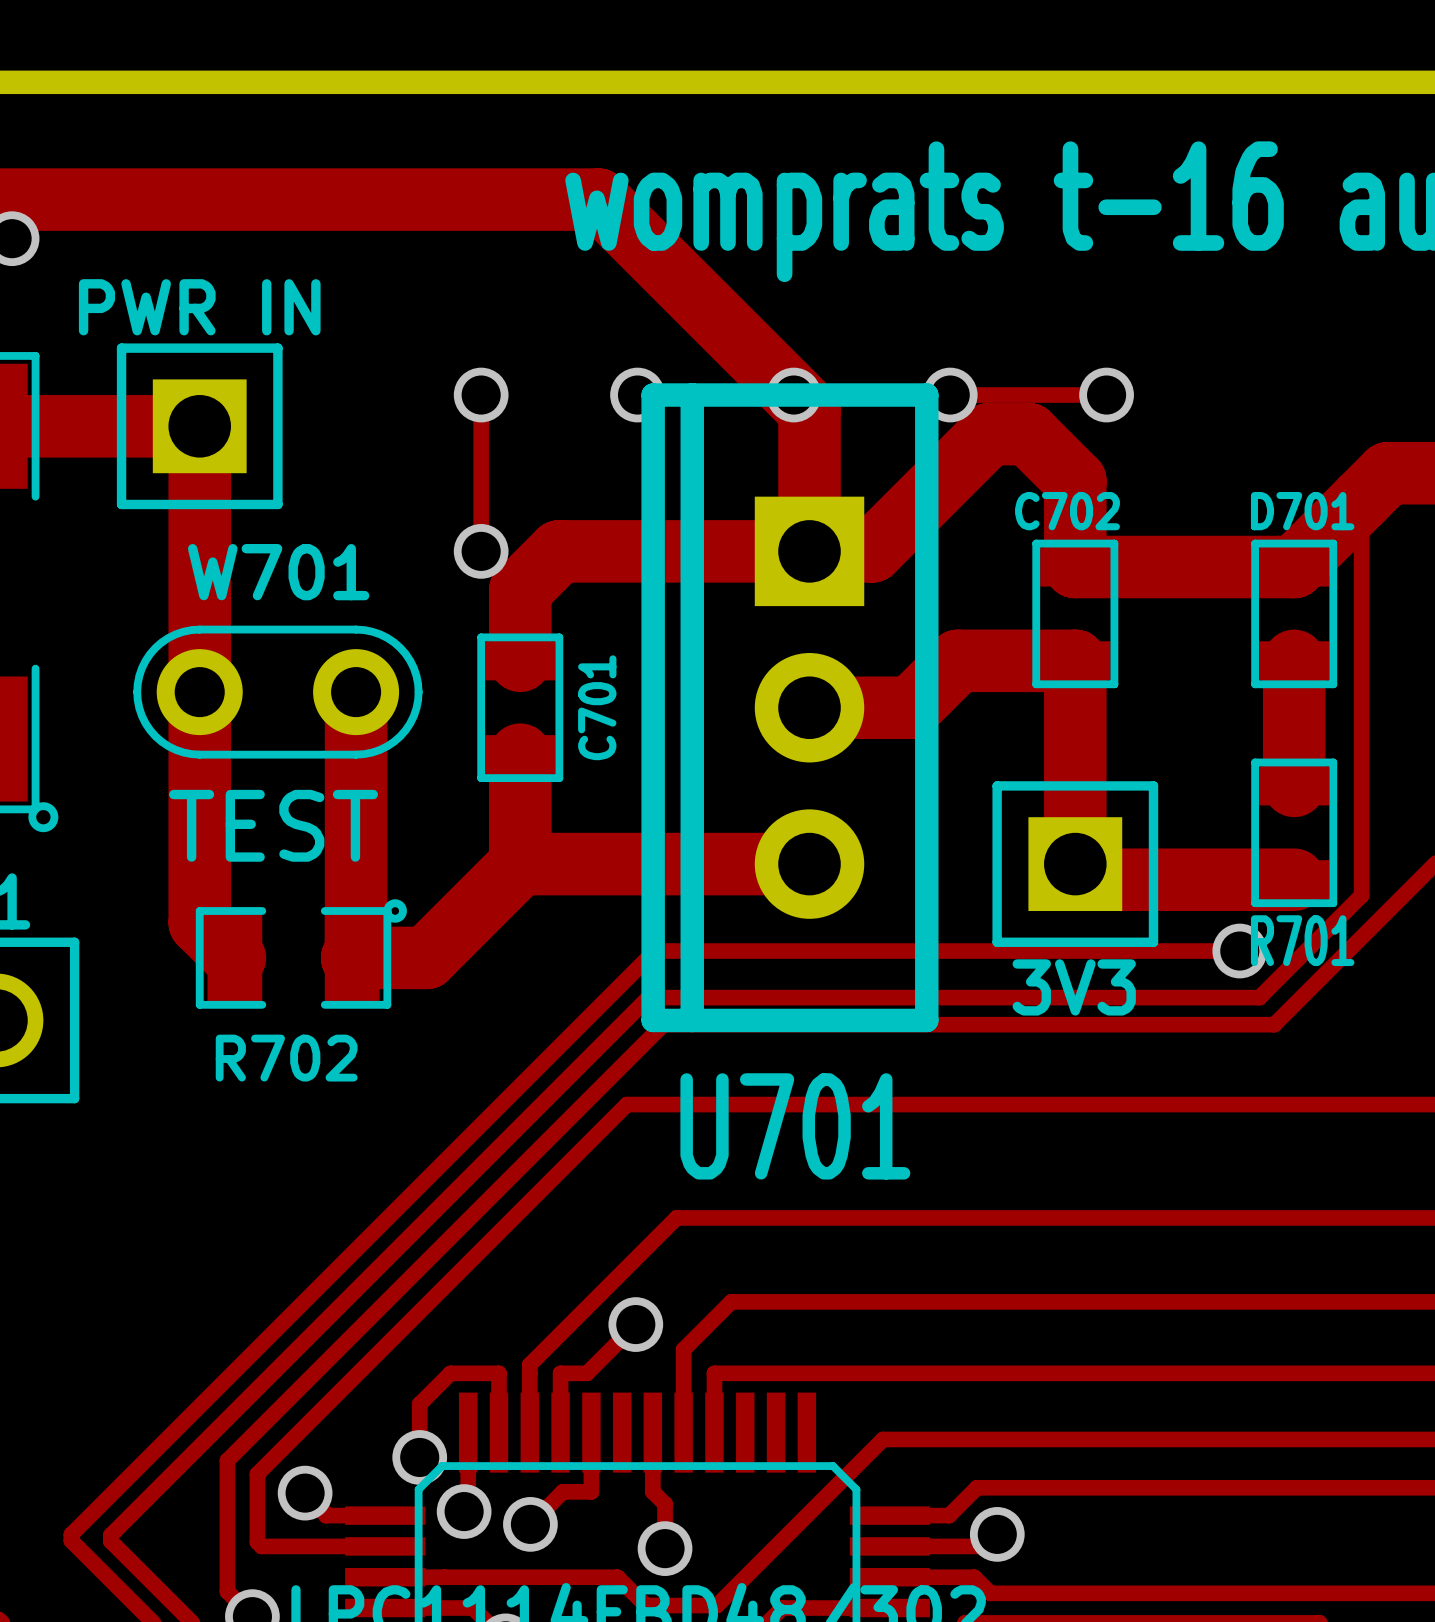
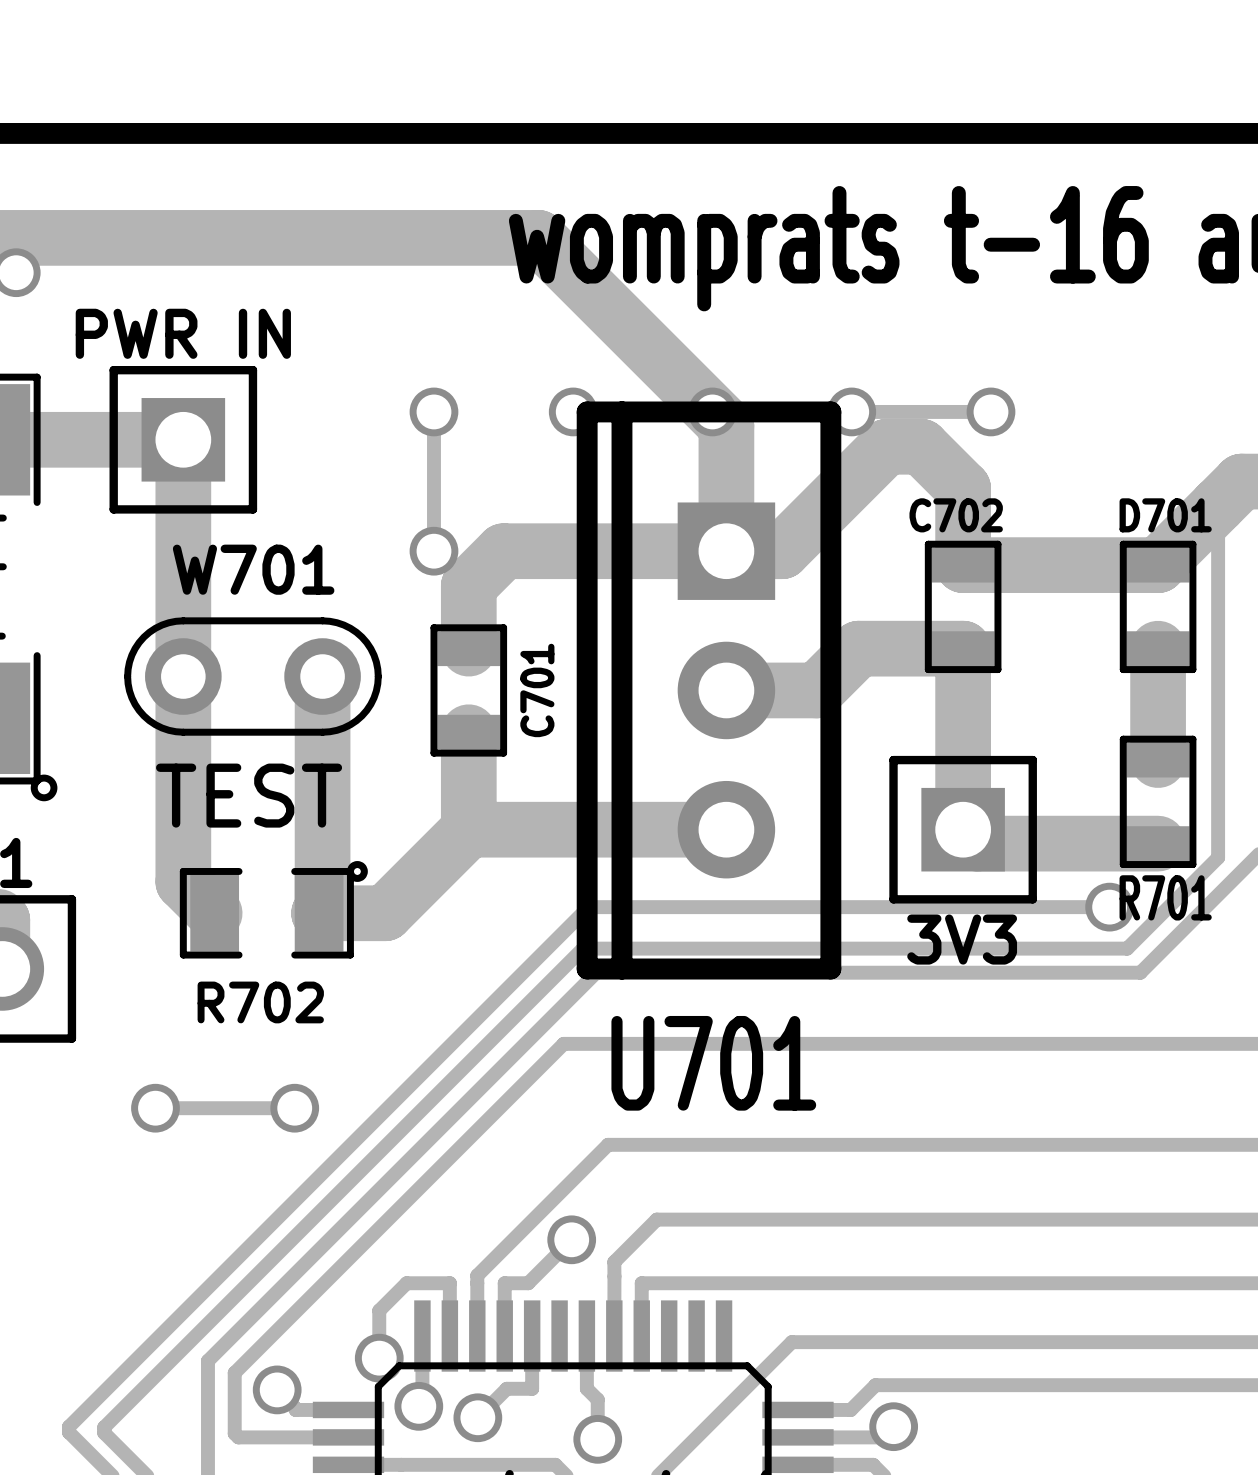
track: none -> (155, 1108) (294, 1108)
via: none -> (155, 1108)
via: none -> (294, 1108)

